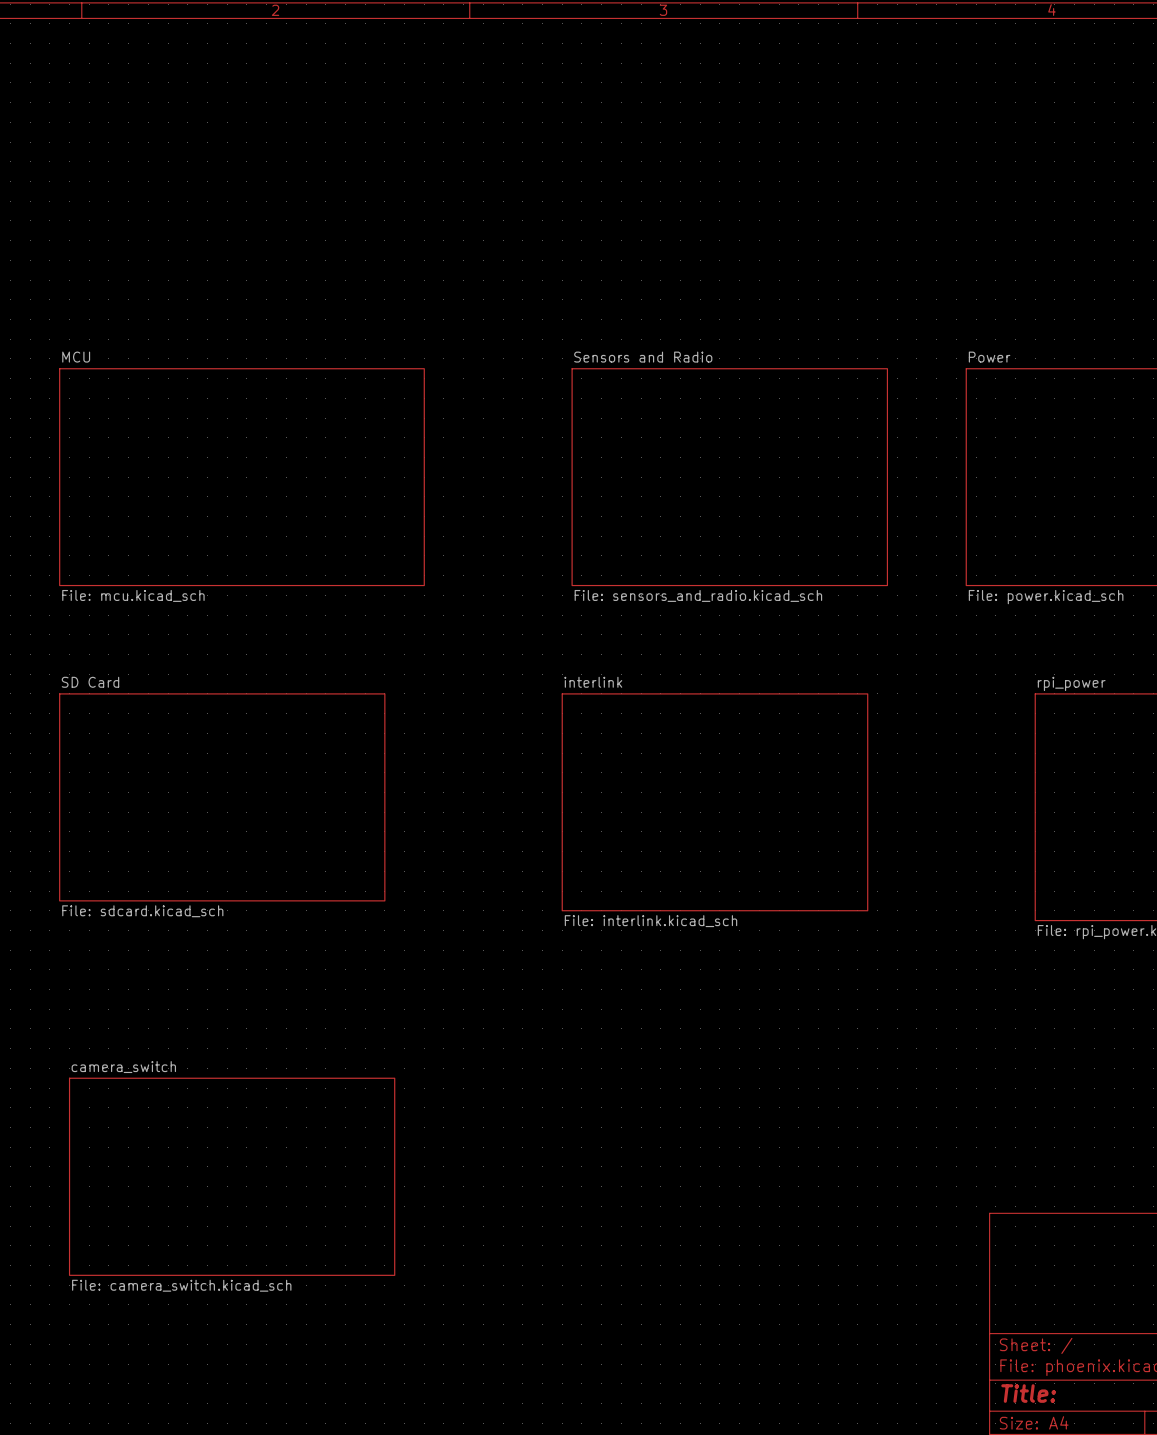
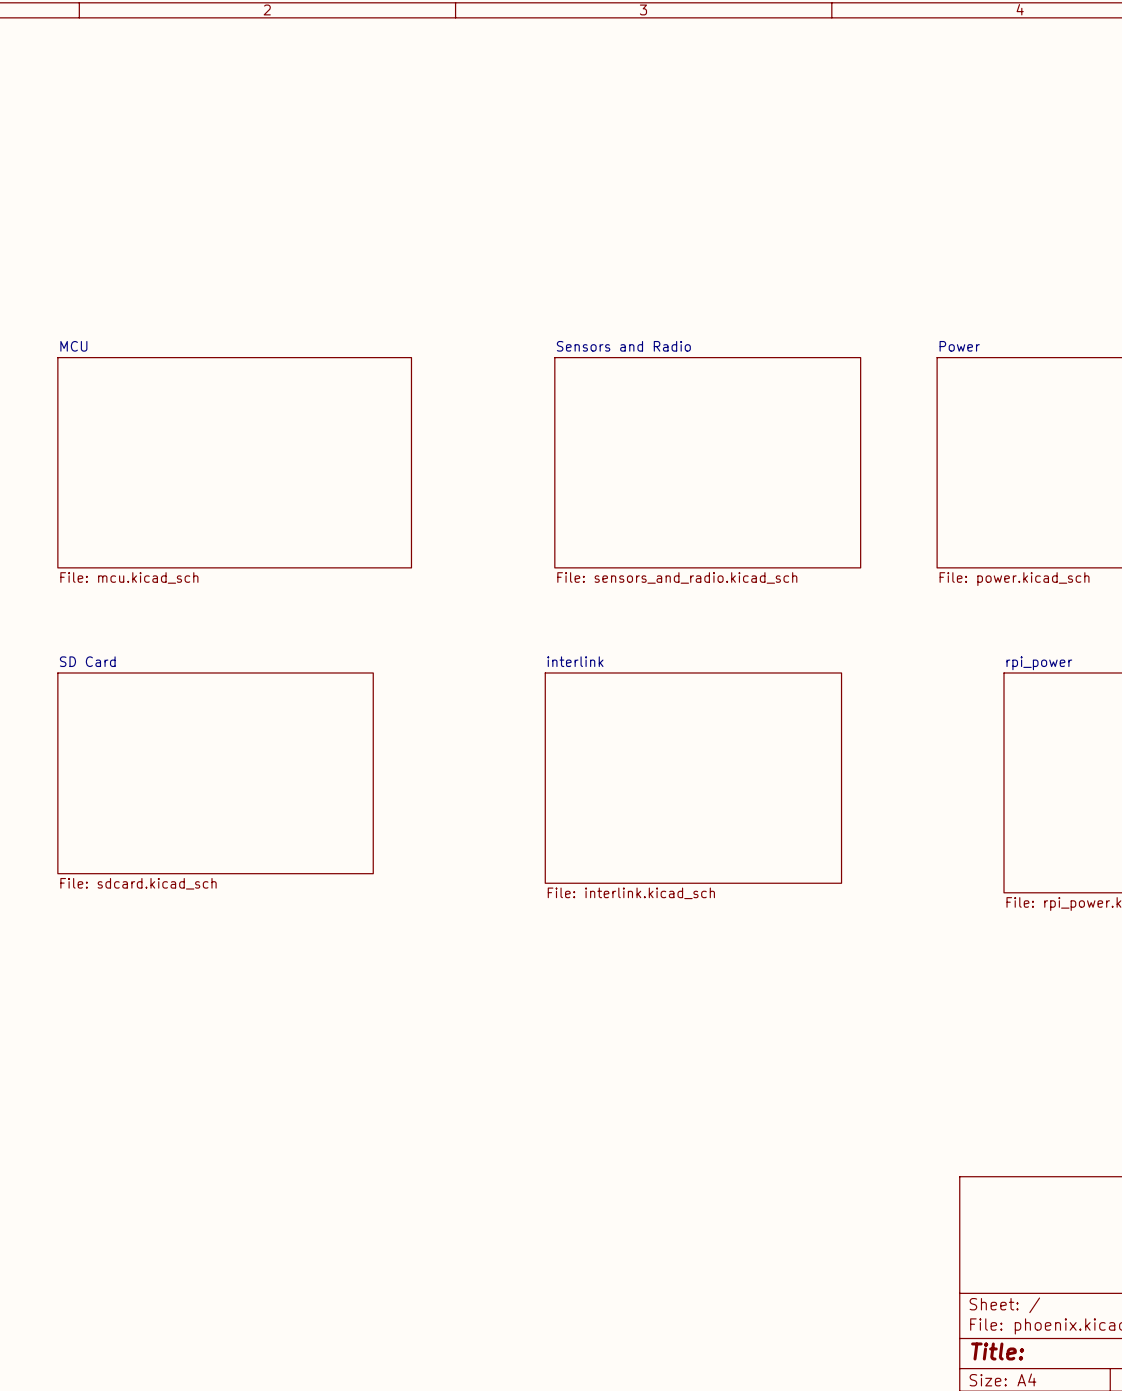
sheet camera_switch: File: camera_switch.kicad_sch (232, 1176) -> none

